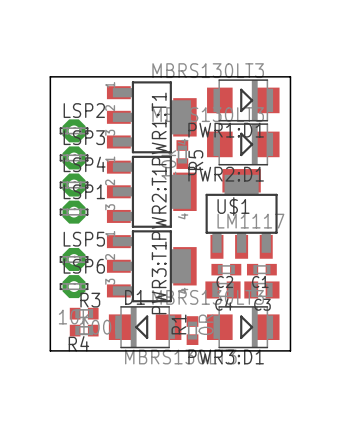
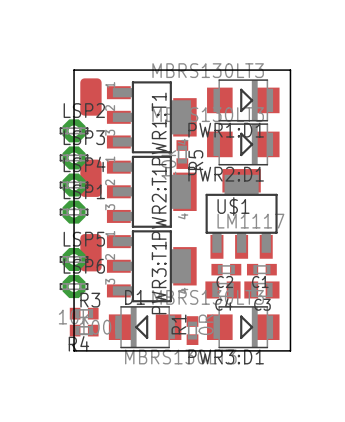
board edge: (290, 76) (50, 76) (50, 350) (74, 350) -> (290, 76) (290, 70) (74, 70) (74, 350)
part: none -> (90, 97)
part: none -> (90, 178)
part: none -> (90, 252)

